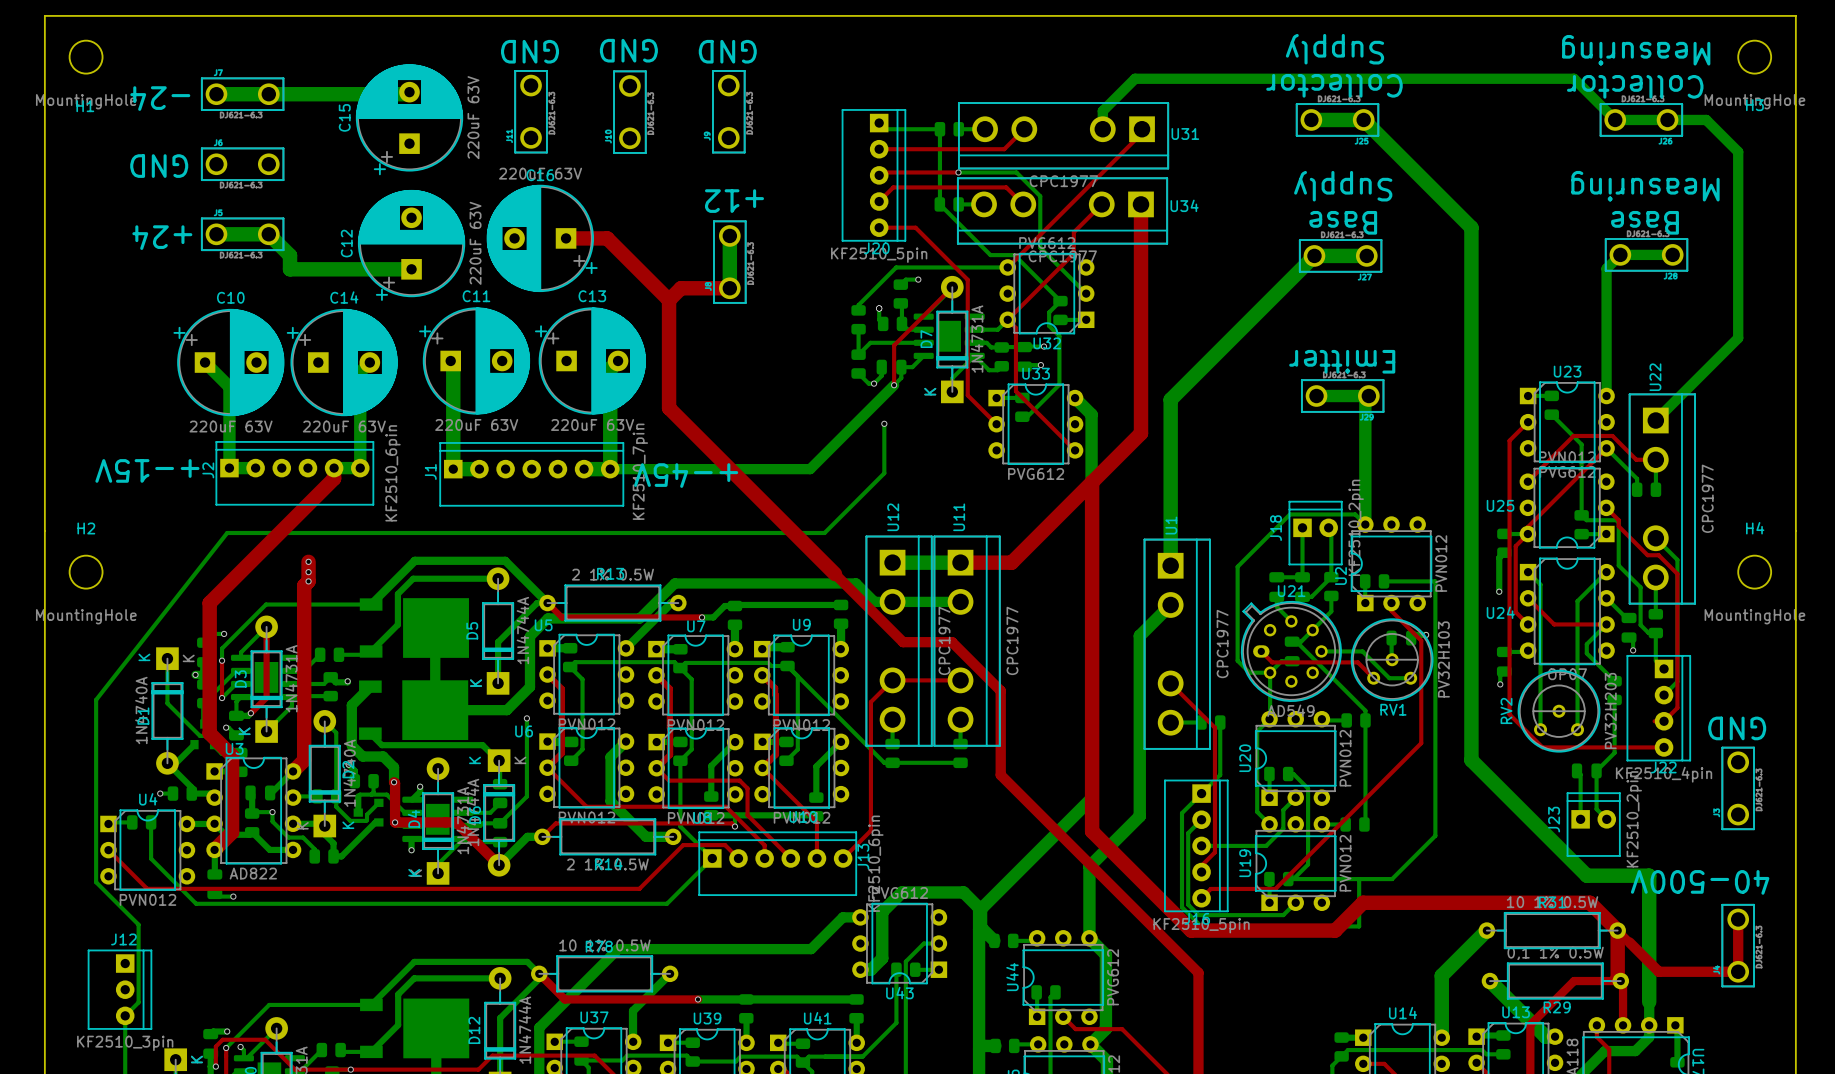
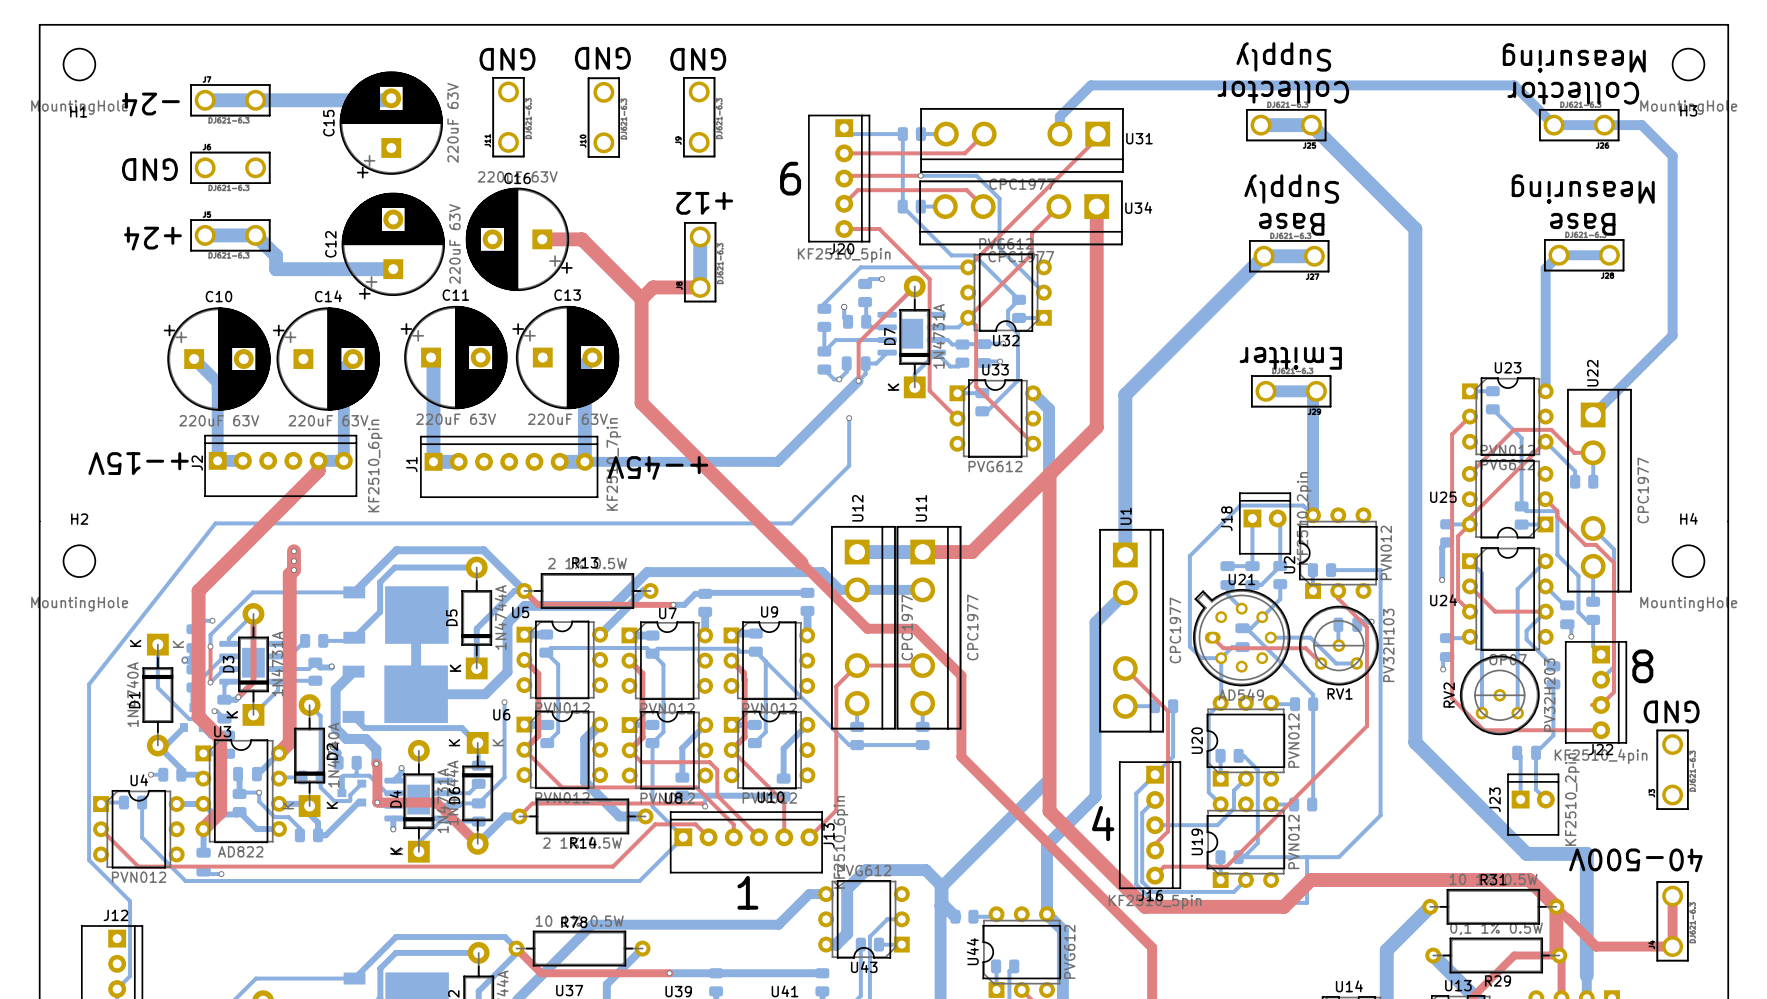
text: none -> 6 (790, 178)
text: none -> 8 (1642, 666)
text: none -> 4 (1103, 823)
text: none -> 1 (747, 892)

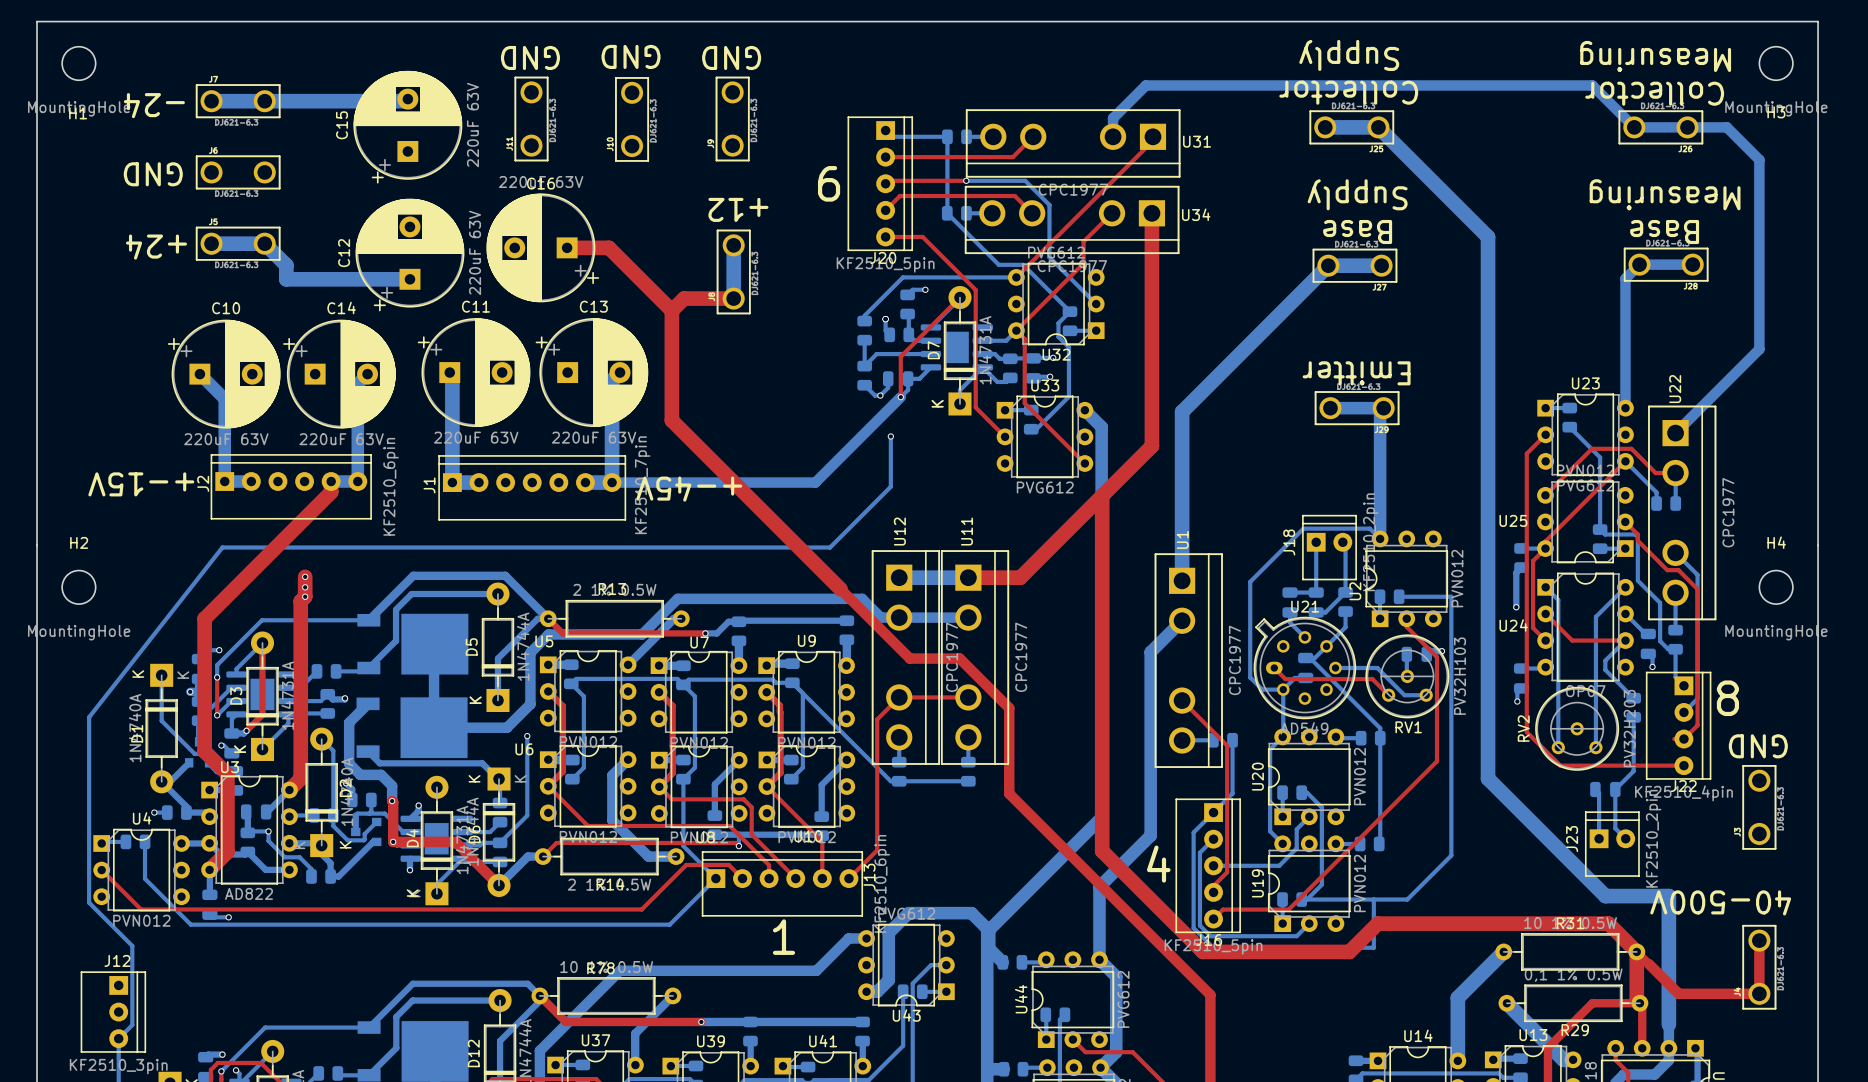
U25 name: U25 (1443, 497) -> U24 (1513, 625)
U24 name: U24 (1443, 600) -> U25 (1513, 520)

